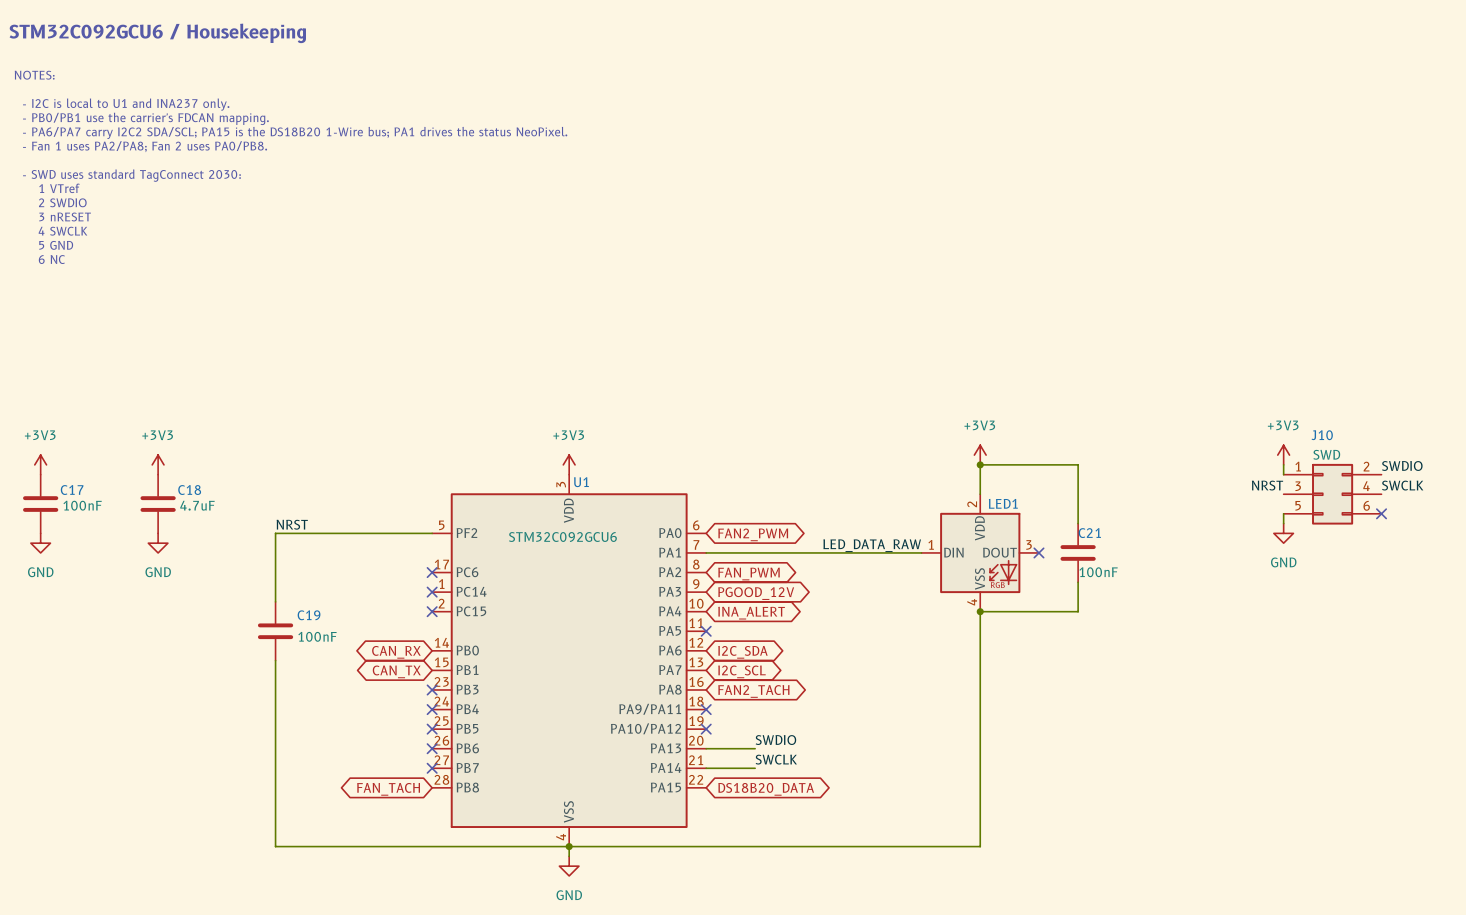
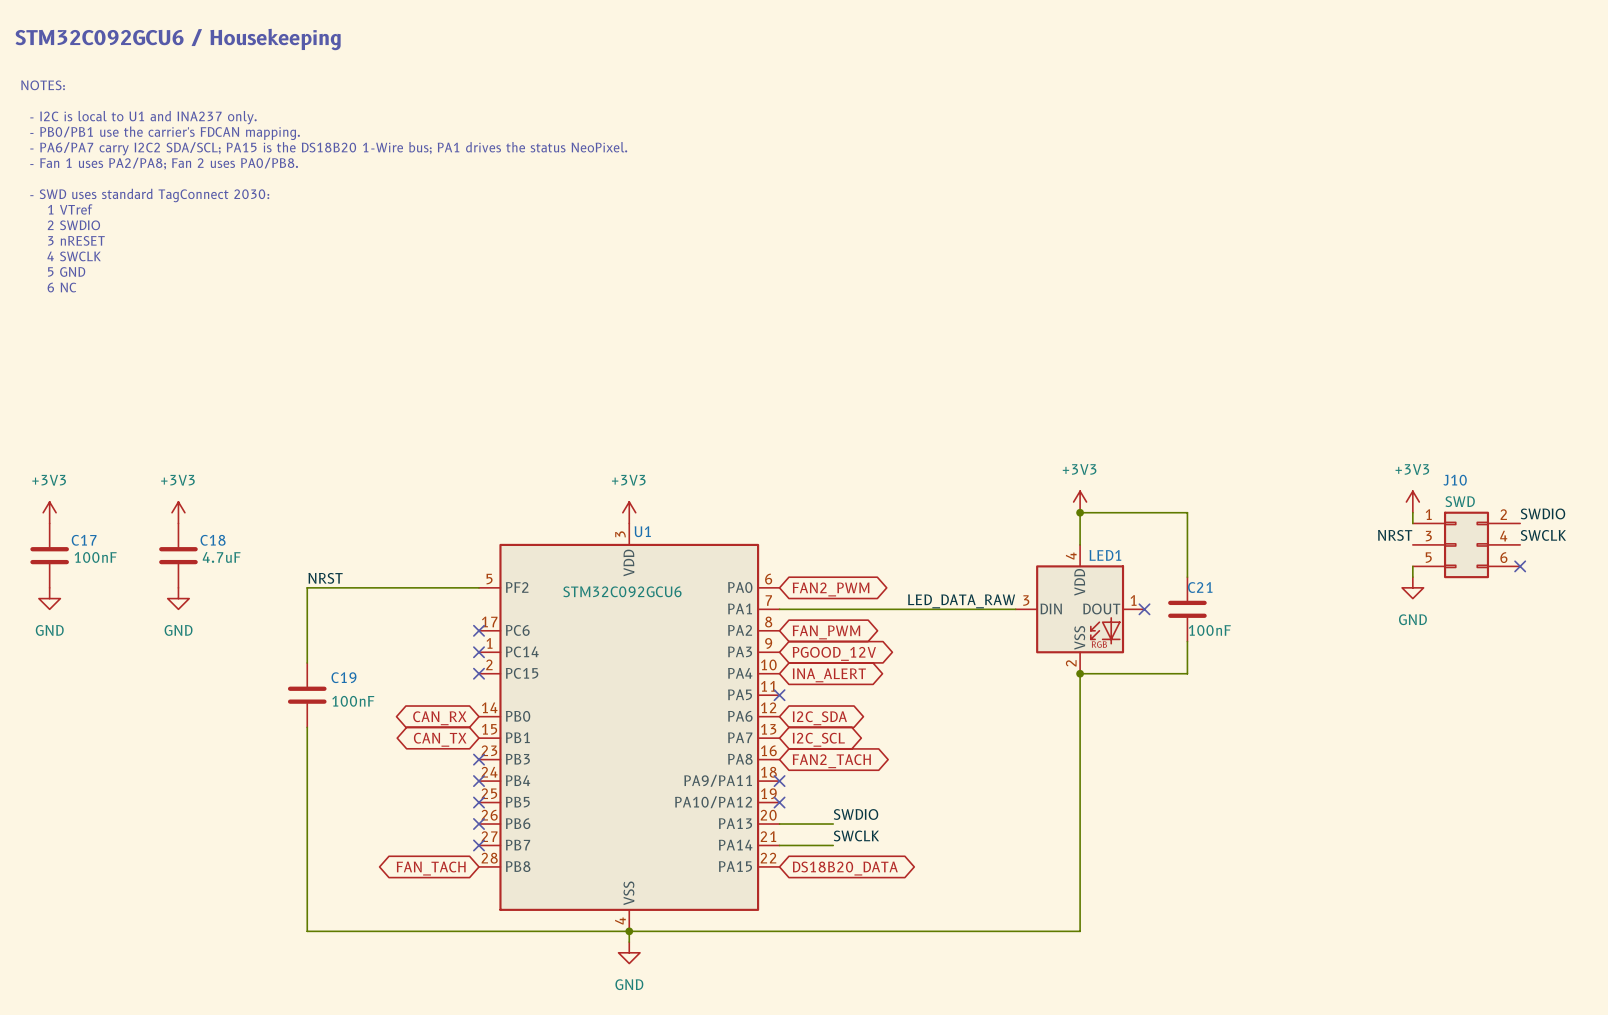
LED1 pin number: 2 (972, 504) -> 4 (1071, 556)
LED1 pin number: 1 (931, 544) -> 3 (1026, 600)
LED1 pin number: 3 (1029, 544) -> 1 (1133, 600)
LED1 pin number: 4 (972, 602) -> 2 (1071, 663)

